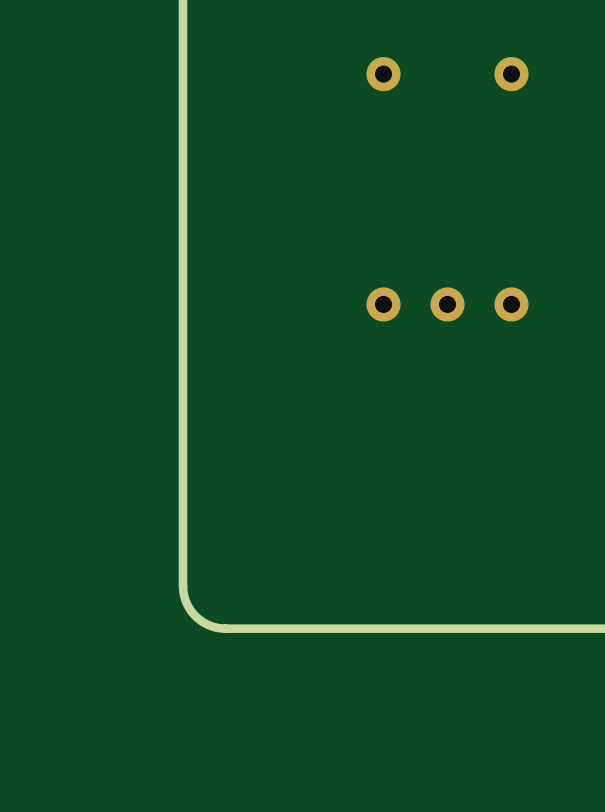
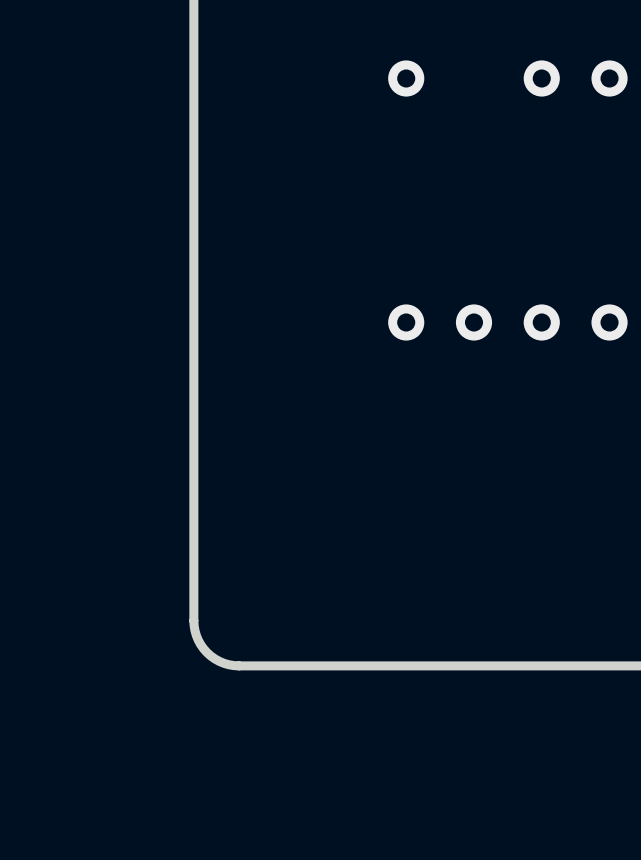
via: none -> (609, 78)
via: none -> (609, 322)

